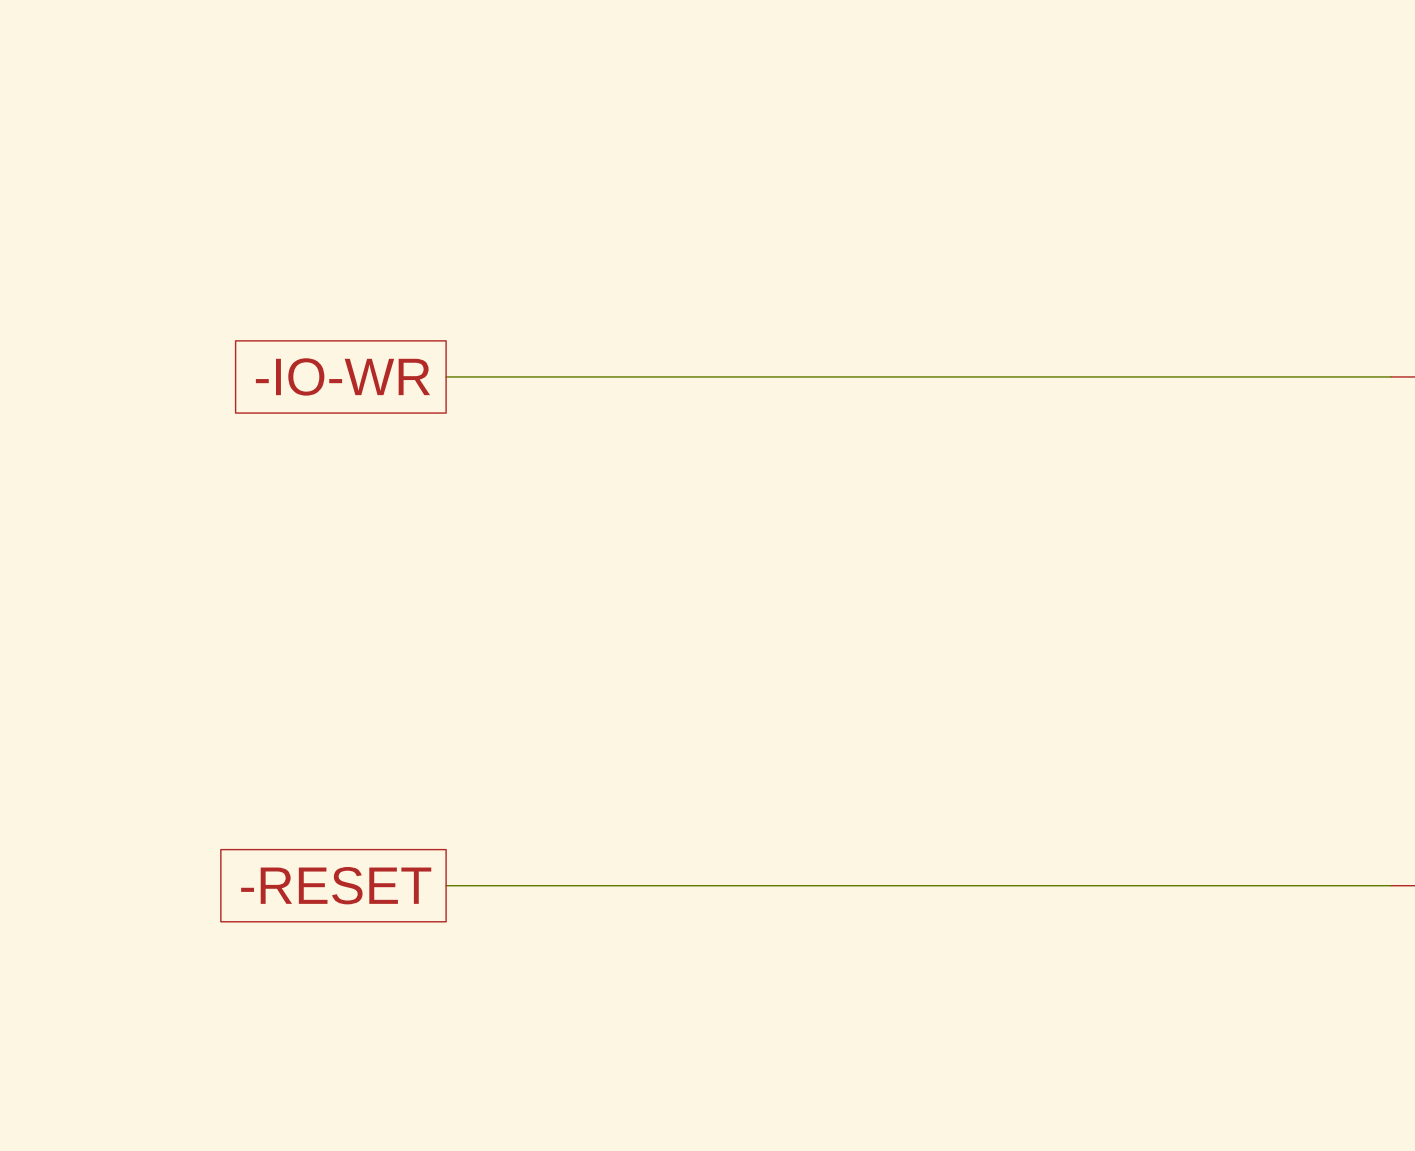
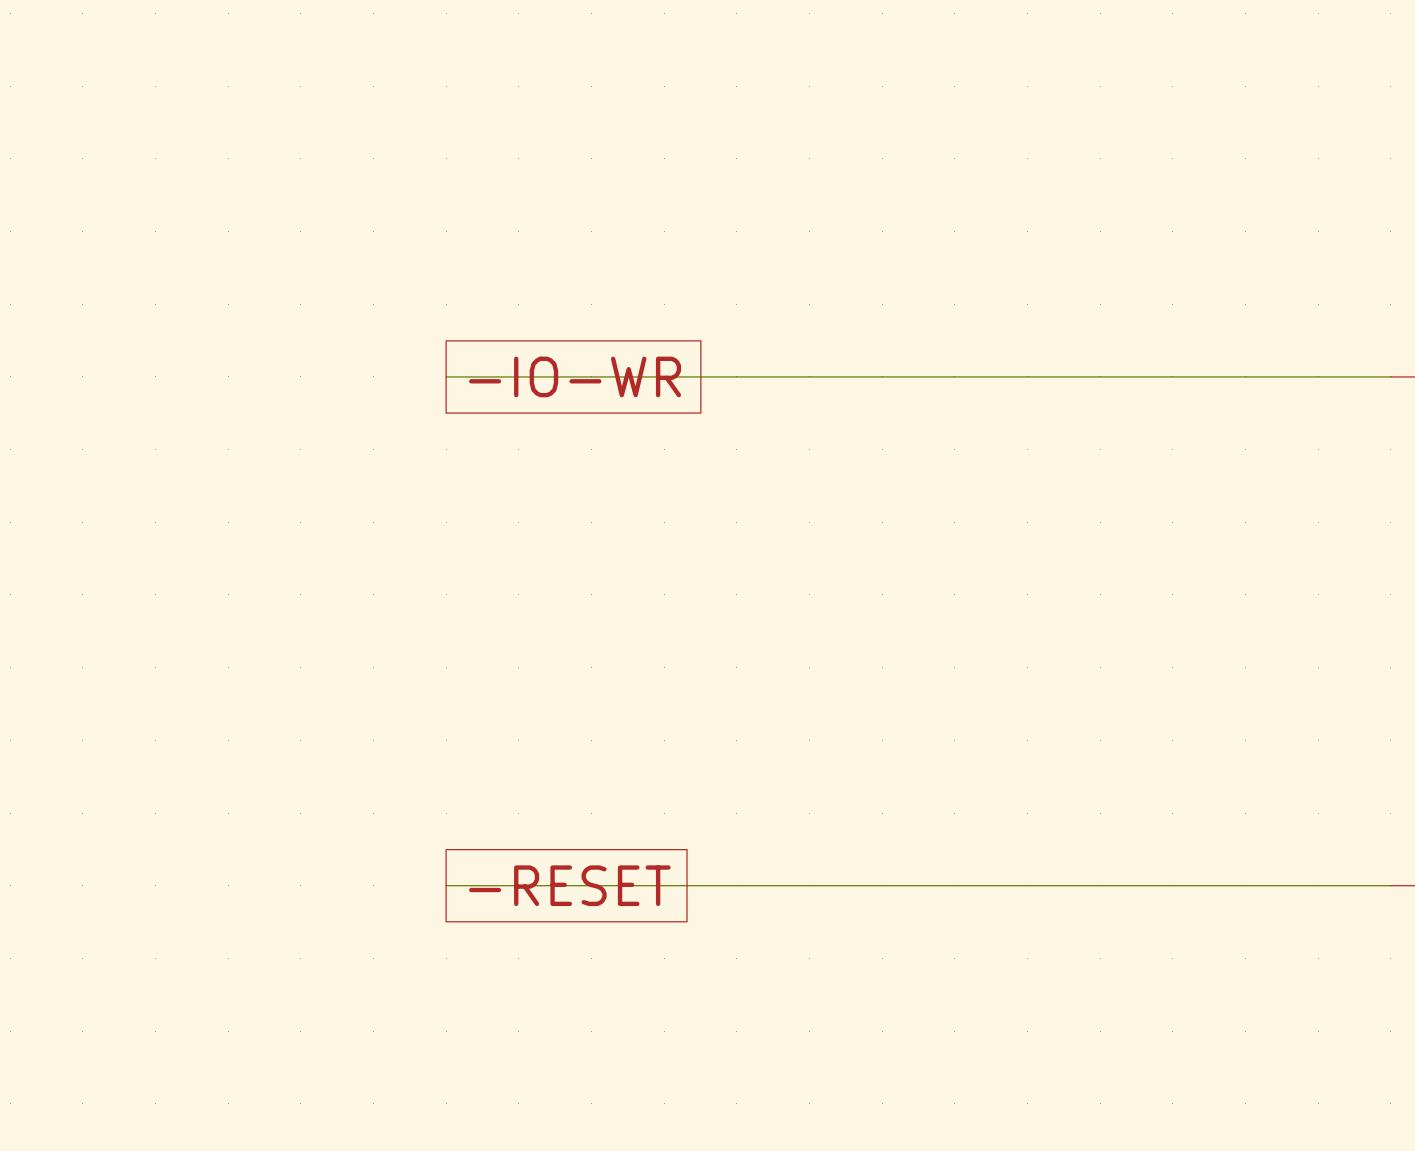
global label rotation: 0° (342, 376) -> 180° (575, 376)
global label rotation: 0° (336, 885) -> 180° (569, 885)

